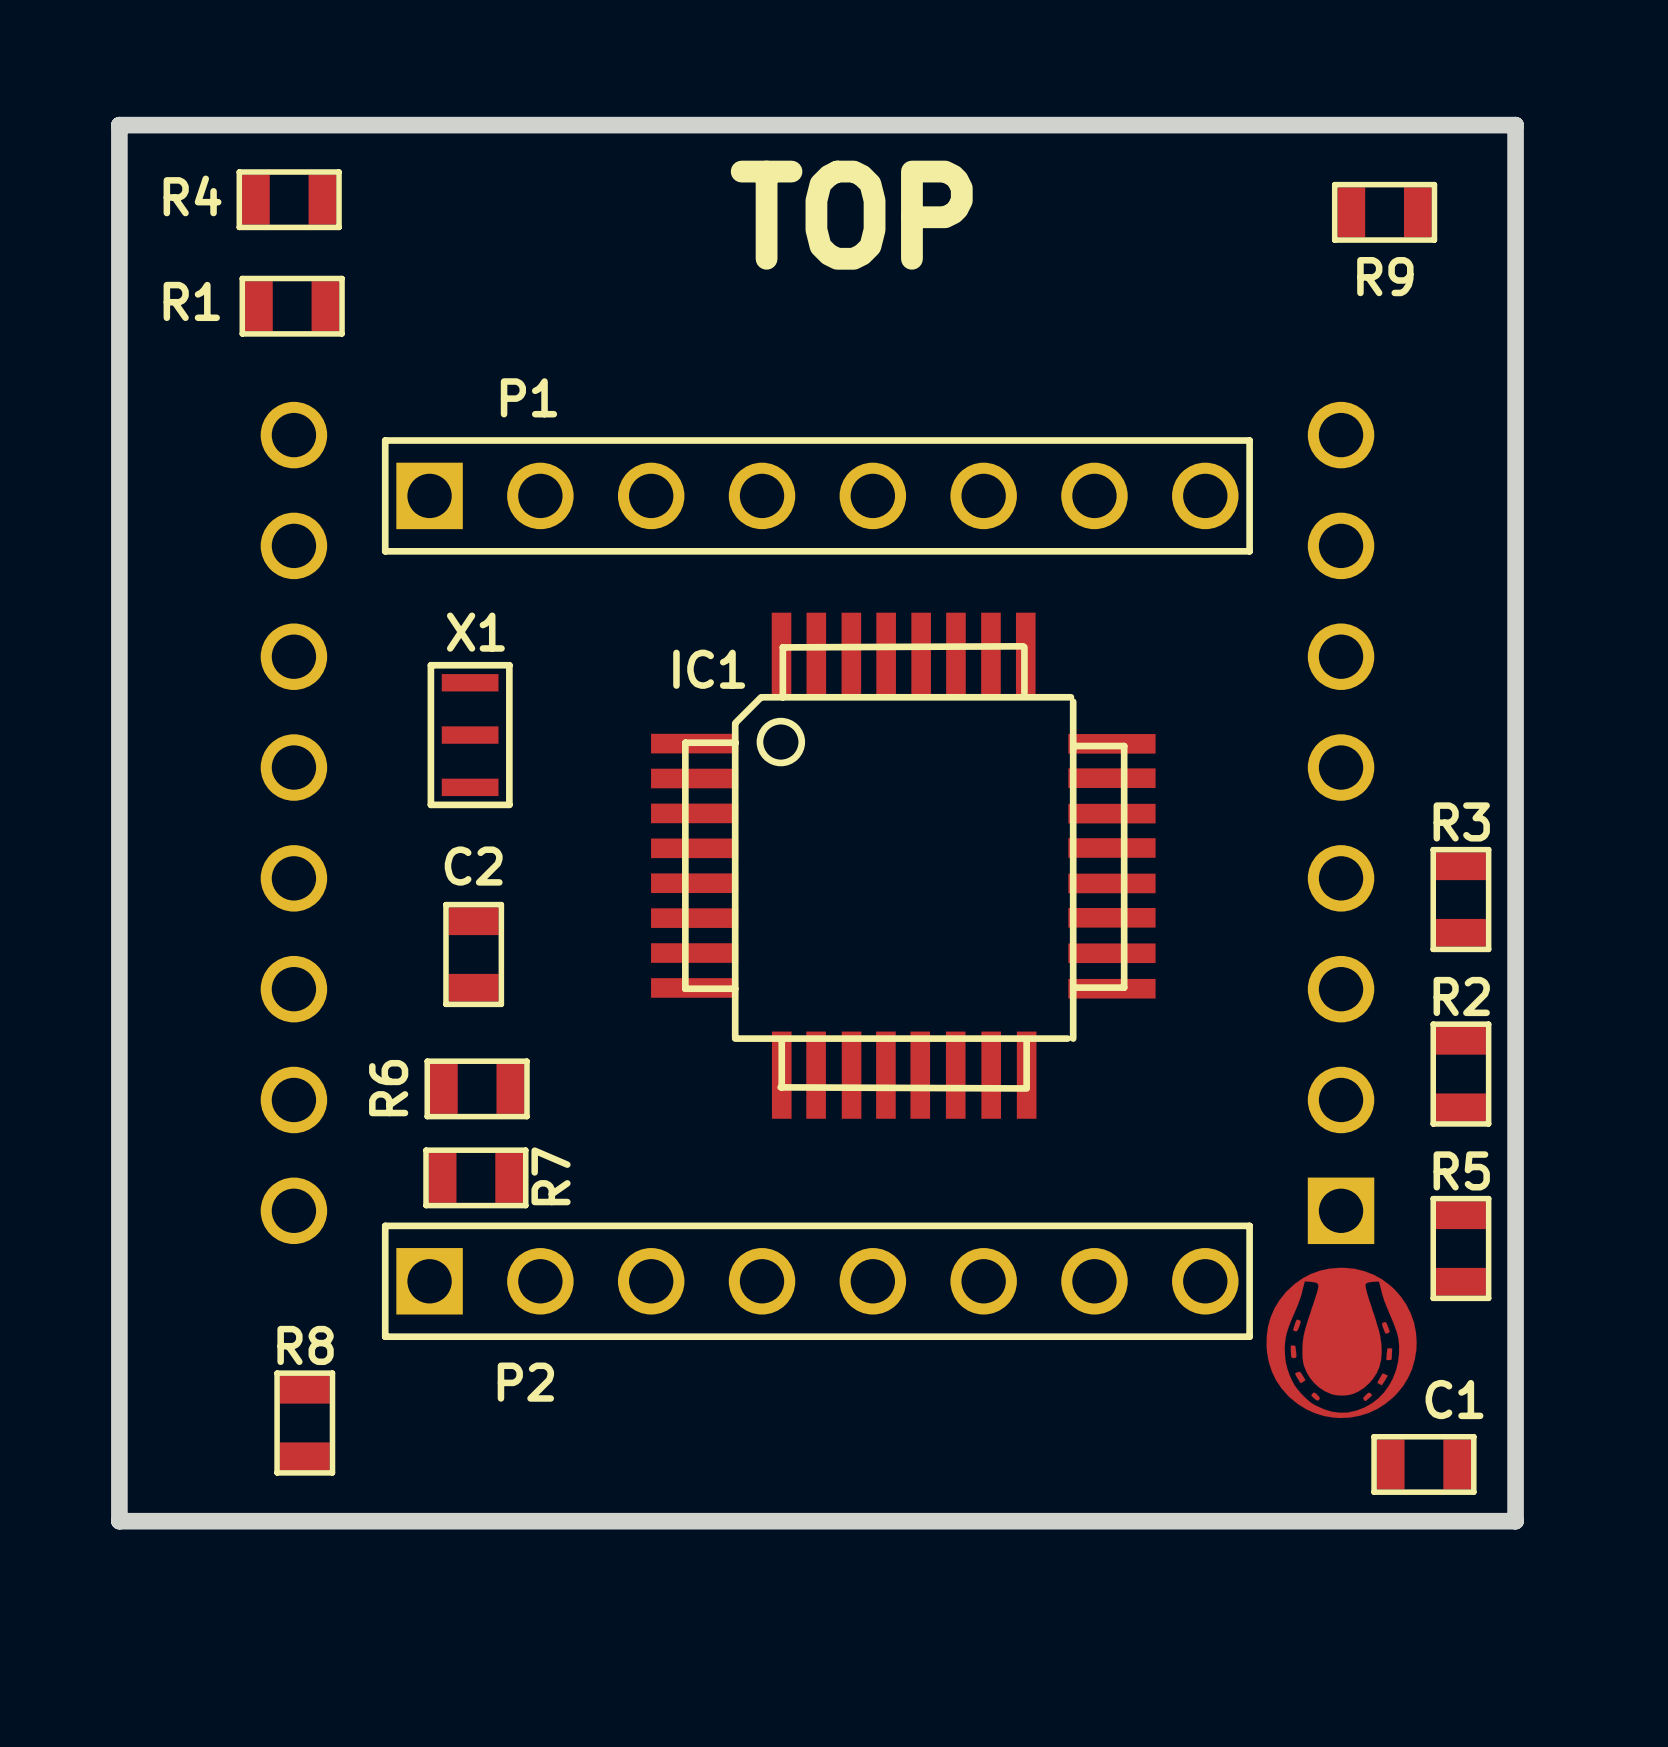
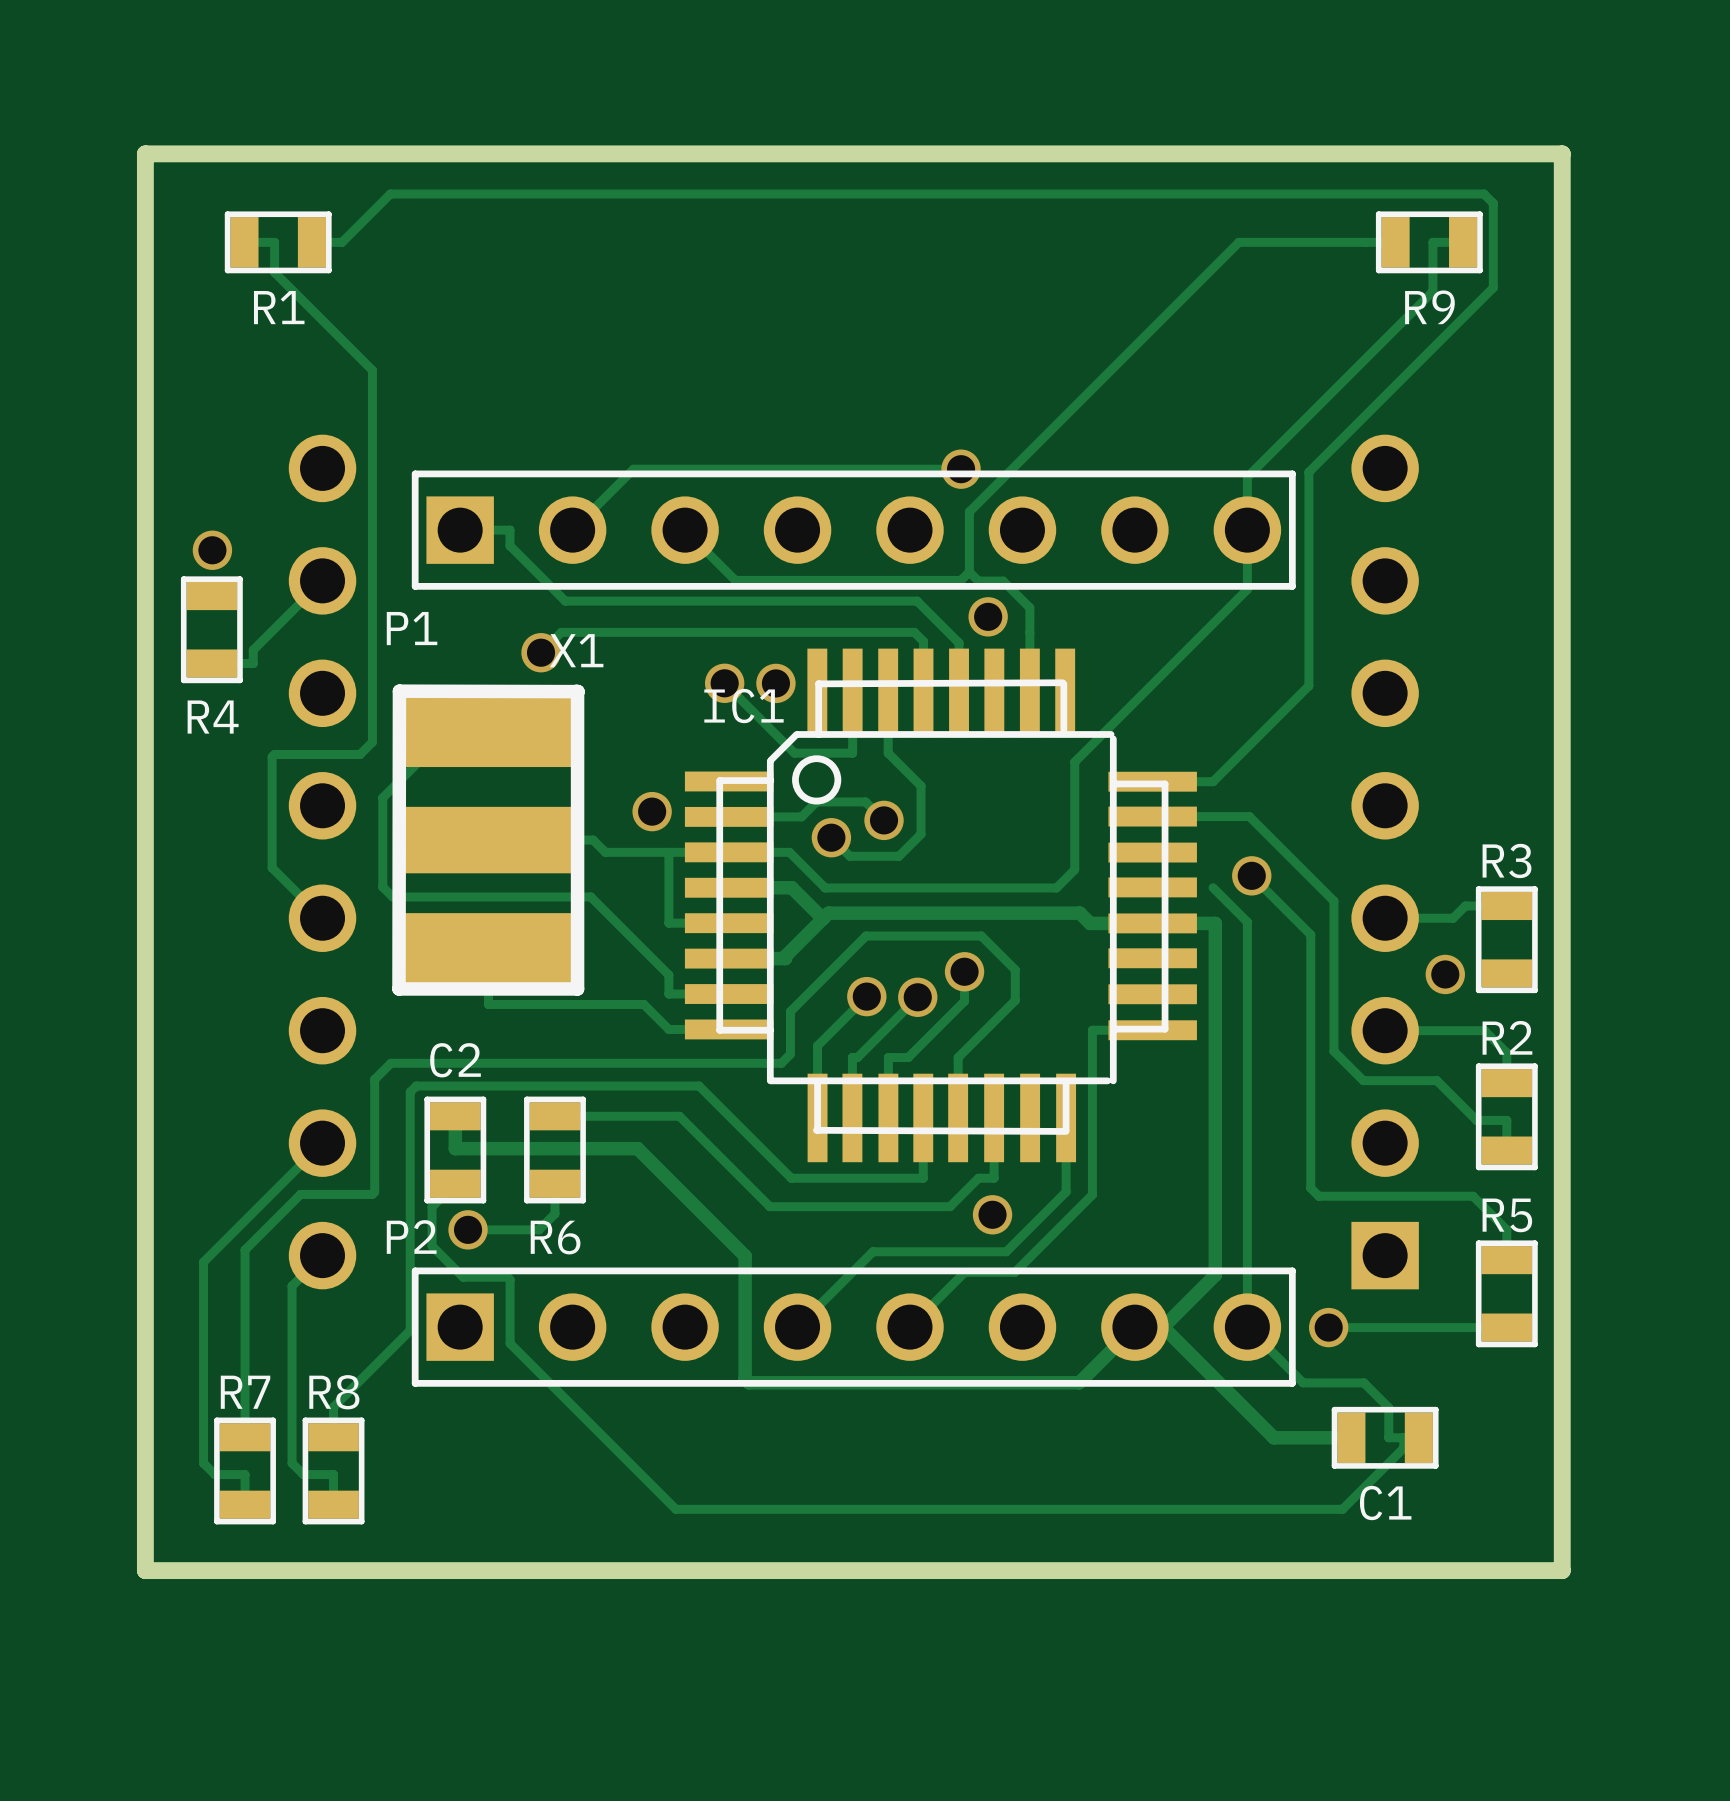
R4 name position: R4 (192, 195) -> R4 (213, 717)
R1 position: (289, 199) -> (278, 242)
track: none -> (244, 242) (274, 242) (274, 272) (372, 370) (372, 742) (360, 754) (274, 754) (272, 756) (272, 867) (322, 918)
track: none -> (311, 242) (342, 242) (390, 194) (1483, 194) (1493, 203) (1493, 287) (1308, 472) (1308, 685) (1213, 781) (1152, 781)
track: none -> (1395, 242) (1238, 242) (969, 511) (969, 571)
track: none -> (1463, 242) (1432, 242) (1432, 291) (1247, 477) (1247, 589) (1074, 762) (1074, 869) (1056, 887) (825, 887) (789, 852) (605, 852) (593, 840) (488, 840)
text: TOP (851, 215) -> none
R1 name position: R1 (191, 301) -> R1 (279, 307)
R4 rotation: 0° (292, 306) -> 90° clockwise (211, 629)
R4 position: (292, 306) -> (211, 629)
P1 name position: P1 (528, 397) -> P1 (412, 628)
track: none -> (961, 469) (633, 469) (572, 530)
via: none -> (961, 469)
track: none -> (460, 530) (509, 530) (509, 545) (565, 601) (917, 601) (959, 643) (959, 692)
track: none -> (685, 530) (735, 580) (960, 580) (969, 571)
via: none -> (212, 550)
track: none -> (969, 571) (978, 581) (1003, 581) (1029, 607) (1029, 692)
track: none -> (322, 580) (253, 650) (253, 663) (211, 663)
via: none -> (988, 616)
track: none -> (541, 652) (561, 632) (914, 632) (923, 641) (923, 692)
via: none -> (541, 652)
X1 name position: X1 (475, 632) -> X1 (576, 650)
track: none -> (724, 683) (794, 753) (852, 753) (852, 692)
via: none -> (724, 683)
via: none -> (775, 683)
track: none -> (888, 692) (888, 753) (921, 785) (921, 834) (898, 856) (849, 856) (831, 837)
X1 footprint: [427, 661, 513, 809] -> [392, 684, 585, 996]
track: none -> (488, 729) (451, 729) (382, 797) (382, 887) (392, 896) (590, 896) (668, 975) (668, 994) (729, 994)
via: none -> (652, 811)
track: none -> (729, 816) (801, 816) (816, 801) (865, 801) (884, 820)
track: none -> (1152, 816) (1249, 816) (1333, 901) (1333, 1051) (1363, 1080) (1436, 1080) (1476, 1120) (1506, 1120) (1506, 1150)
via: none -> (884, 820)
via: none -> (831, 837)
track: none -> (668, 852) (668, 923) (729, 923)
track: none -> (1251, 875) (1310, 934) (1310, 1188) (1318, 1196) (1473, 1196) (1506, 1229) (1506, 1260)
via: none -> (1251, 875)
track: none -> (729, 887) (791, 887) (822, 918)
track: none -> (1213, 887) (1247, 922) (1247, 1327) (1303, 1382) (1363, 1382) (1388, 1407) (1388, 1437) (1418, 1437)
track: none -> (1506, 905) (1465, 905) (1453, 918) (1385, 918)
track: none -> (488, 950) (488, 1004) (643, 1004) (668, 1029) (729, 1029)
track: none -> (729, 958) (785, 958) (785, 956) (828, 913) (1079, 913) (1090, 923) (1215, 923) (1215, 1275) (1163, 1327)
track: none -> (964, 971) (964, 1001) (908, 1057) (888, 1057) (888, 1117)
via: none -> (964, 971)
via: none -> (1445, 974)
C2 position: (473, 954) -> (455, 1150)
track: none -> (866, 996) (817, 1045) (817, 1117)
via: none -> (866, 996)
track: none -> (917, 997) (857, 1057) (852, 1057) (852, 1117)
via: none -> (917, 997)
track: none -> (1152, 1030) (1092, 1030) (1092, 1194) (1014, 1272) (964, 1272) (910, 1327)
track: none -> (1385, 1030) (1484, 1030) (1506, 1052) (1506, 1083)
track: none -> (455, 1116) (455, 1148) (637, 1148) (745, 1256) (745, 1378) (748, 1382) (1079, 1382) (1134, 1327) (1163, 1327)
track: none -> (554, 1116) (679, 1116) (769, 1206) (950, 1206) (978, 1178) (994, 1178) (994, 1117)
track: none -> (923, 1117) (923, 1178) (791, 1178) (699, 1086) (416, 1086) (410, 1092) (410, 1330) (333, 1407) (333, 1437)
track: none -> (958, 1117) (958, 1057) (1015, 1000) (1015, 969) (981, 936) (866, 936) (790, 1011) (790, 1054) (781, 1063) (390, 1063) (374, 1079) (374, 1191) (372, 1194) (300, 1194) (245, 1249) (245, 1437)
track: none -> (1066, 1117) (1066, 1191) (1006, 1251) (872, 1251) (797, 1327)
R6 name position: R6 (388, 1088) -> R6 (555, 1237)
R6 rotation: 0° (477, 1088) -> 90° clockwise (554, 1150)
track: none -> (322, 1143) (203, 1262) (203, 1463) (214, 1474) (245, 1474) (245, 1504)
track: none -> (455, 1183) (432, 1207) (432, 1246) (463, 1277) (507, 1277) (510, 1279) (510, 1343) (675, 1509) (1342, 1509) (1403, 1448) (1403, 1437)
track: none -> (554, 1183) (554, 1213) (539, 1229) (468, 1229)
via: none -> (992, 1214)
R7 name position: R7 (551, 1176) -> R7 (245, 1392)
R7 rotation: 0° (475, 1177) -> 90° clockwise (245, 1470)
R7 position: (475, 1177) -> (245, 1470)
via: none -> (468, 1229)
track: none -> (322, 1255) (292, 1286) (292, 1463) (303, 1474) (333, 1474) (333, 1504)
drawing: [1266, 1267, 1417, 1419] -> none
track: none -> (1163, 1327) (1273, 1437) (1351, 1437)
track: none -> (1328, 1327) (1506, 1327)
via: none -> (1328, 1327)
P2 name position: P2 (525, 1382) -> P2 (411, 1236)
C1 name position: C1 (1454, 1399) -> C1 (1385, 1503)
C1 position: (1423, 1464) -> (1385, 1437)

